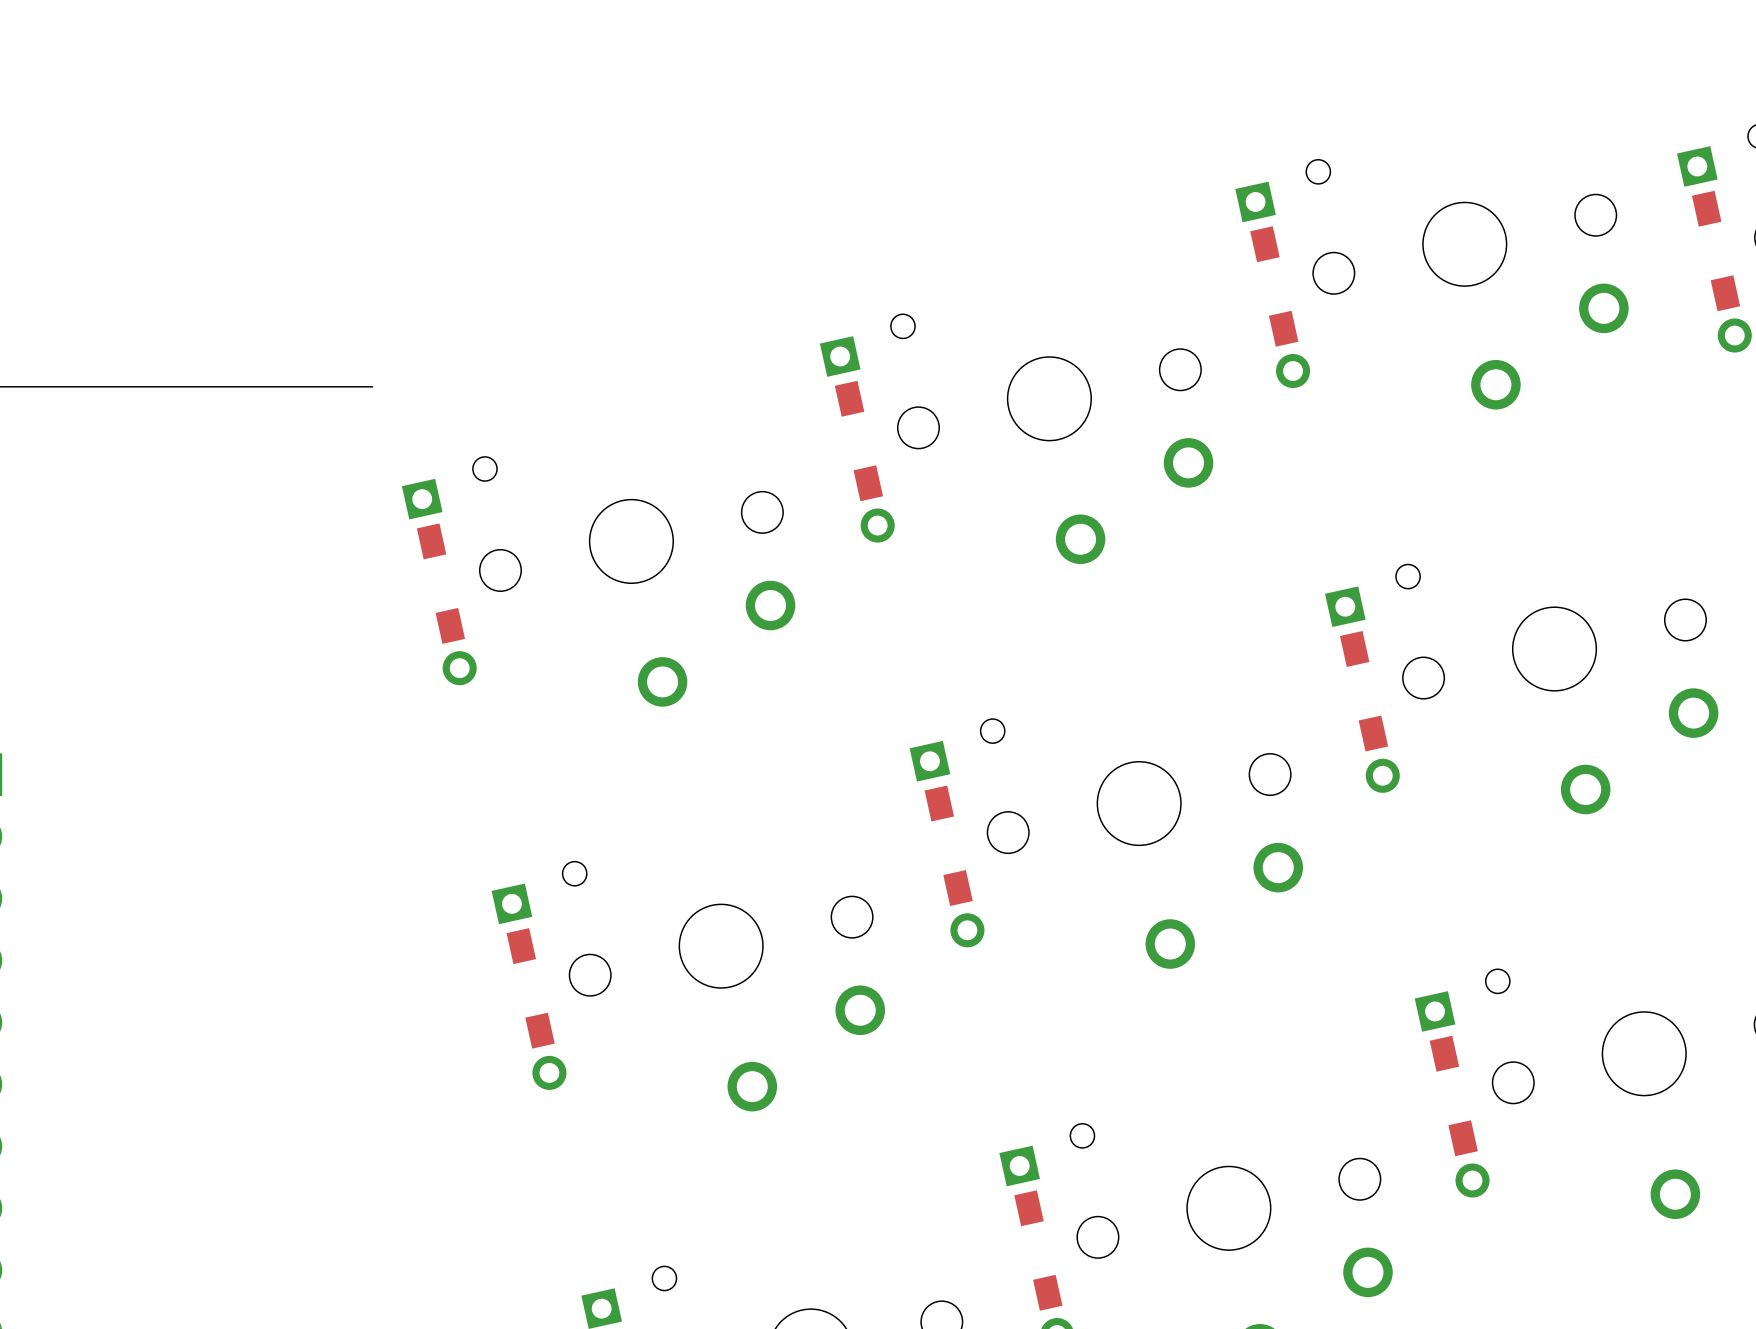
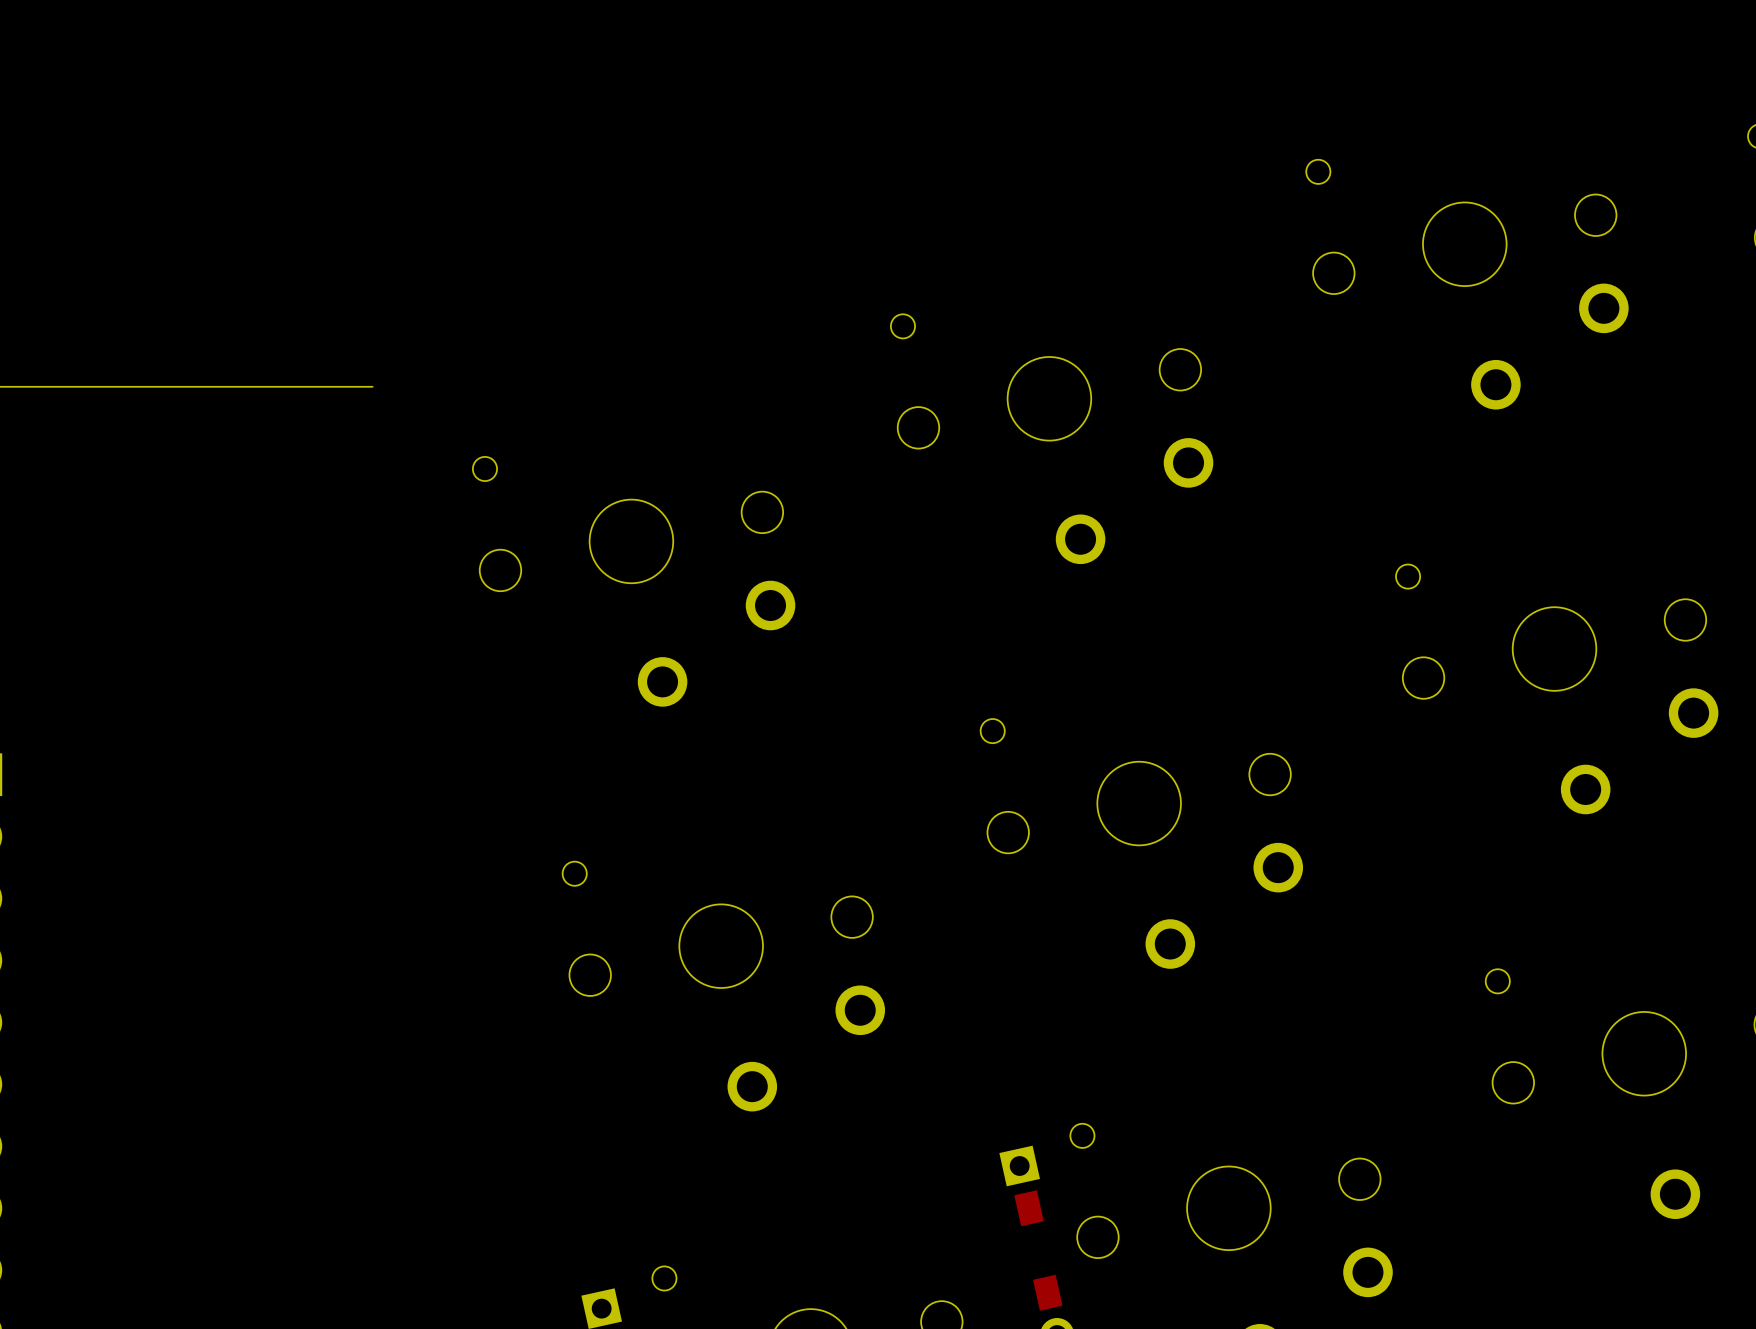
part: (1714, 249) -> none
part: (1272, 284) -> none
part: (857, 439) -> none
part: (439, 582) -> none
part: (1362, 689) -> none
part: (947, 844) -> none
part: (529, 986) -> none
part: (1452, 1094) -> none

